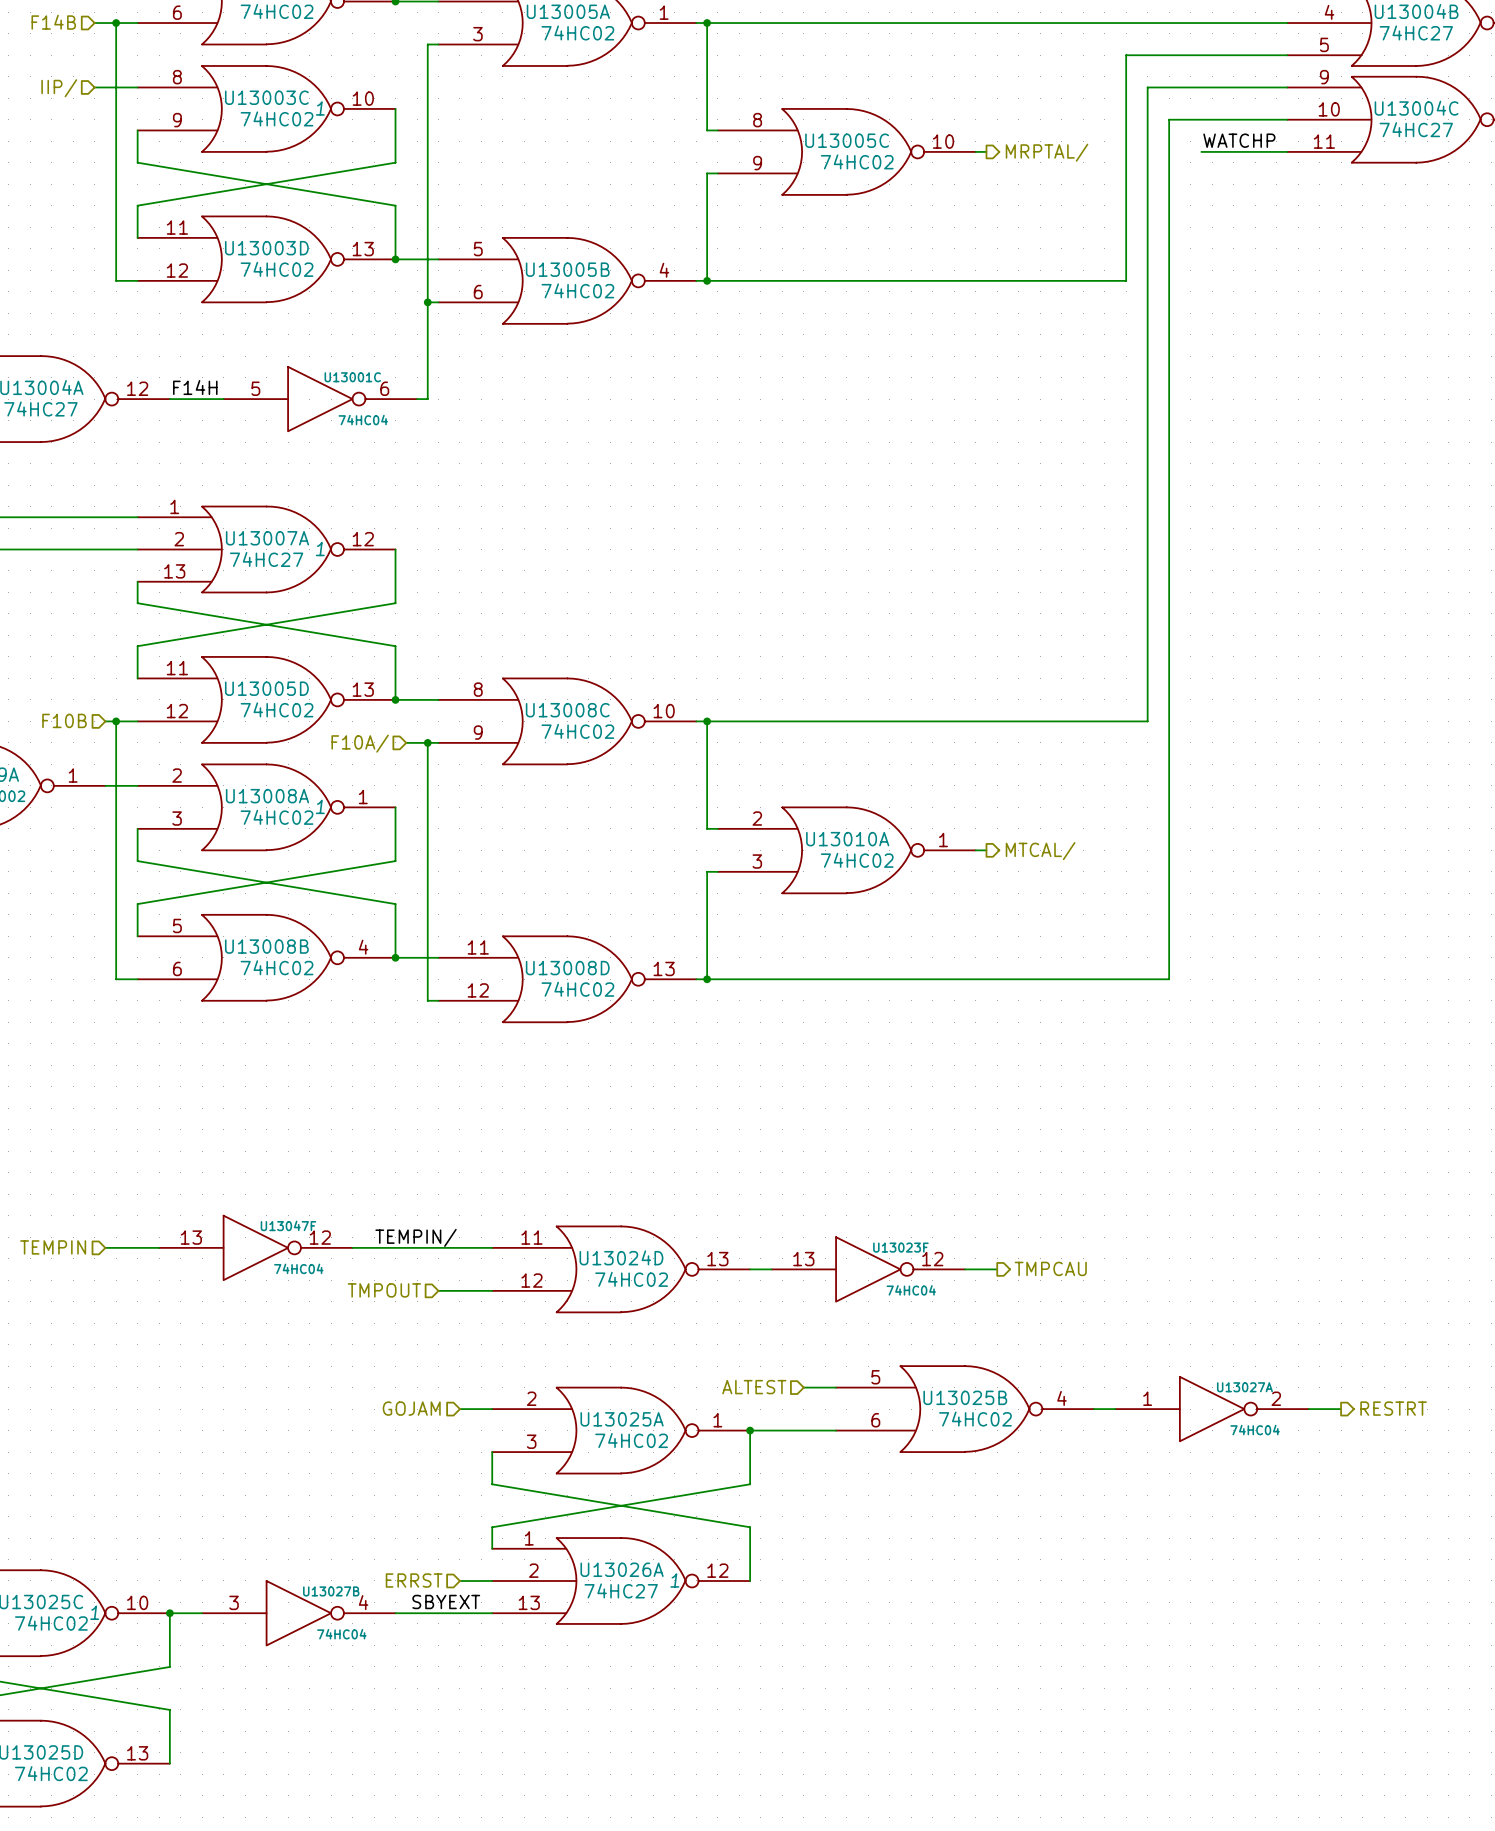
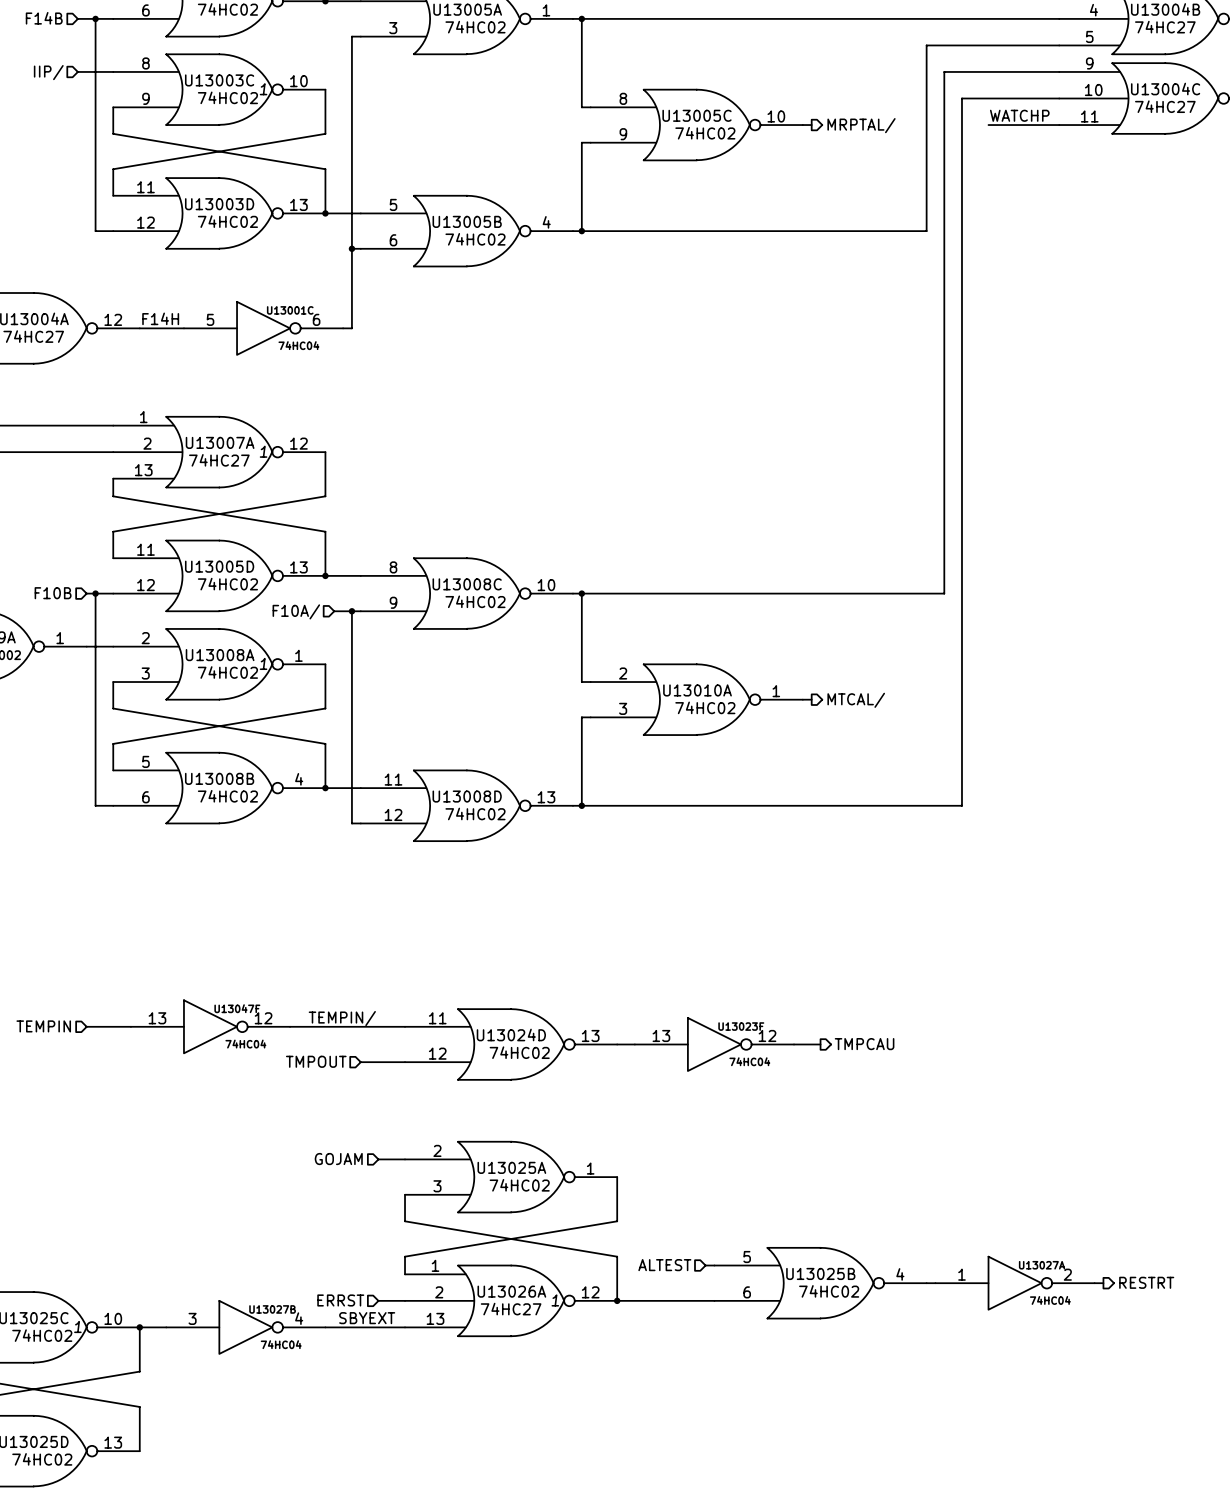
hierarchical label position: ALTEST (754, 1387) -> ALTEST (664, 1265)
wire: (803, 1387) (836, 1387) -> none
hierarchical label position: RESTRT (1393, 1408) -> RESTRT (1146, 1282)
U13025B position: (964, 1409) -> (820, 1283)
wire: (1093, 1409) (1115, 1409) -> none
U13027A position: (1212, 1409) -> (1015, 1283)
wire: (1308, 1409) (1341, 1409) -> none
wire: (750, 1430) (836, 1430) -> none
junction: (750, 1430) -> none
wire: none -> (705, 1265) (714, 1265)
wire: none -> (926, 1283) (935, 1283)
wire: none -> (1094, 1283) (1103, 1283)
wire: none -> (617, 1300) (714, 1300)
junction: none -> (617, 1300)

